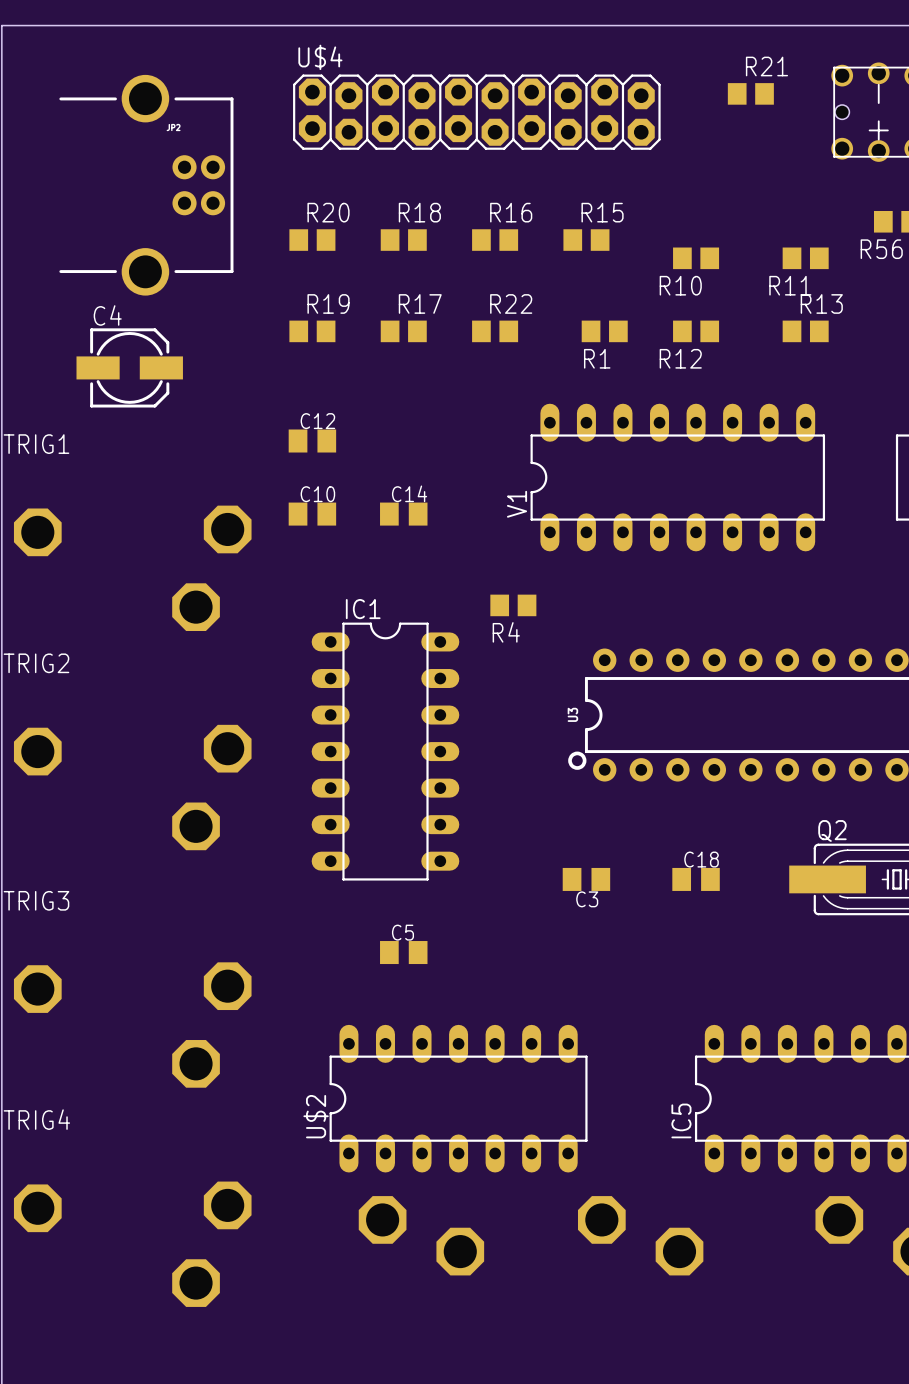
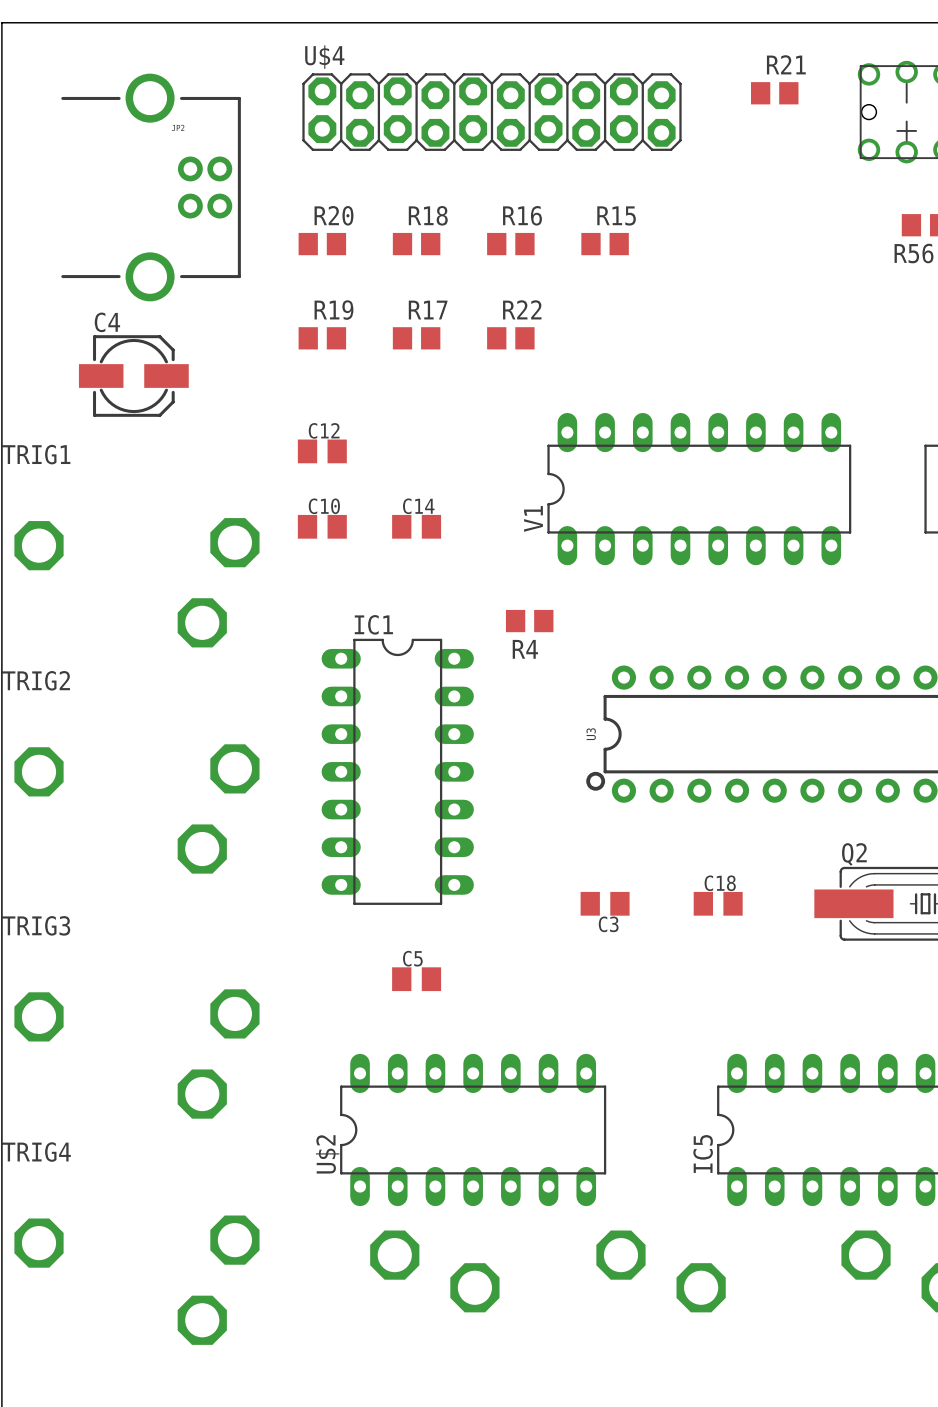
R10: (696, 258) -> none
R11: (805, 258) -> none
R1: (604, 331) -> none
R12: (696, 331) -> none
R13: (805, 331) -> none

